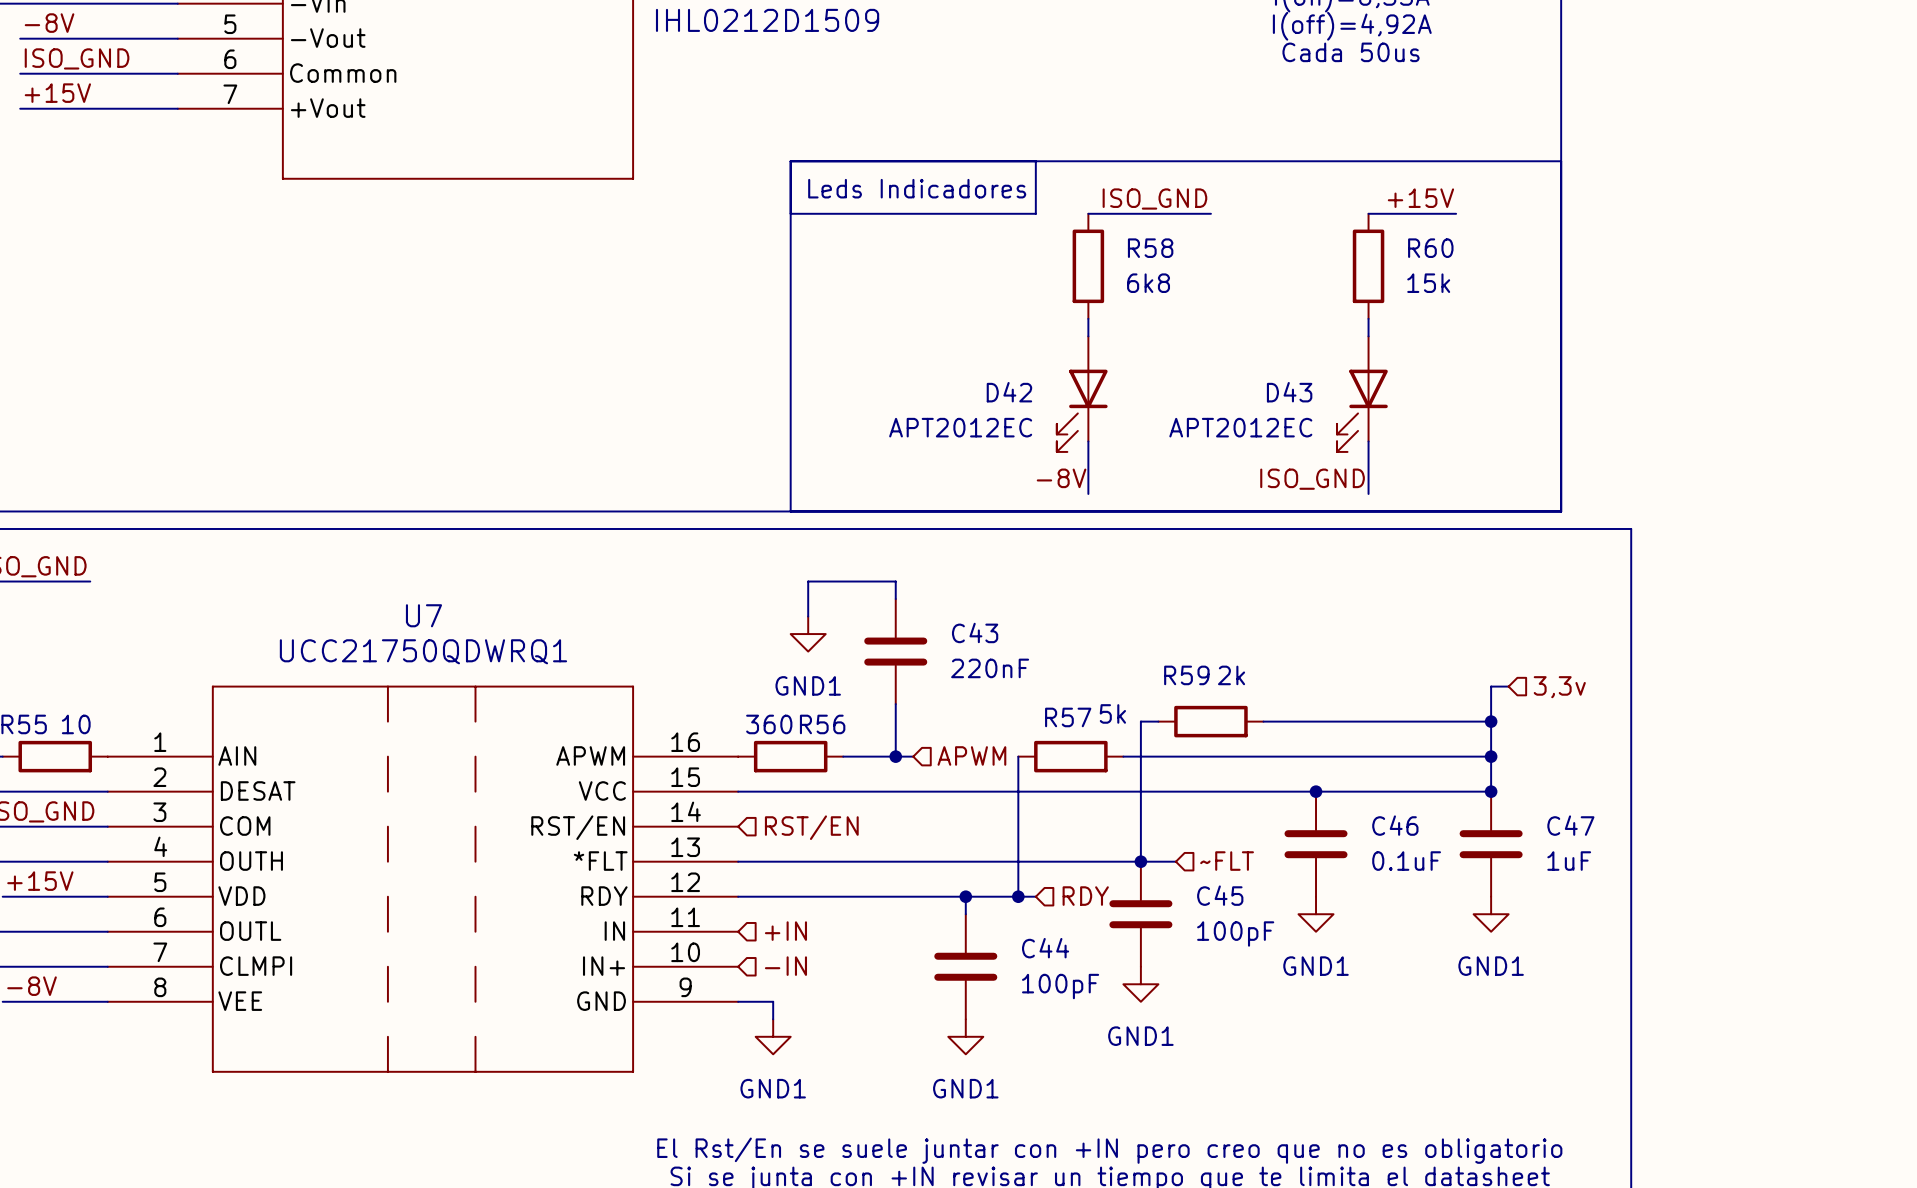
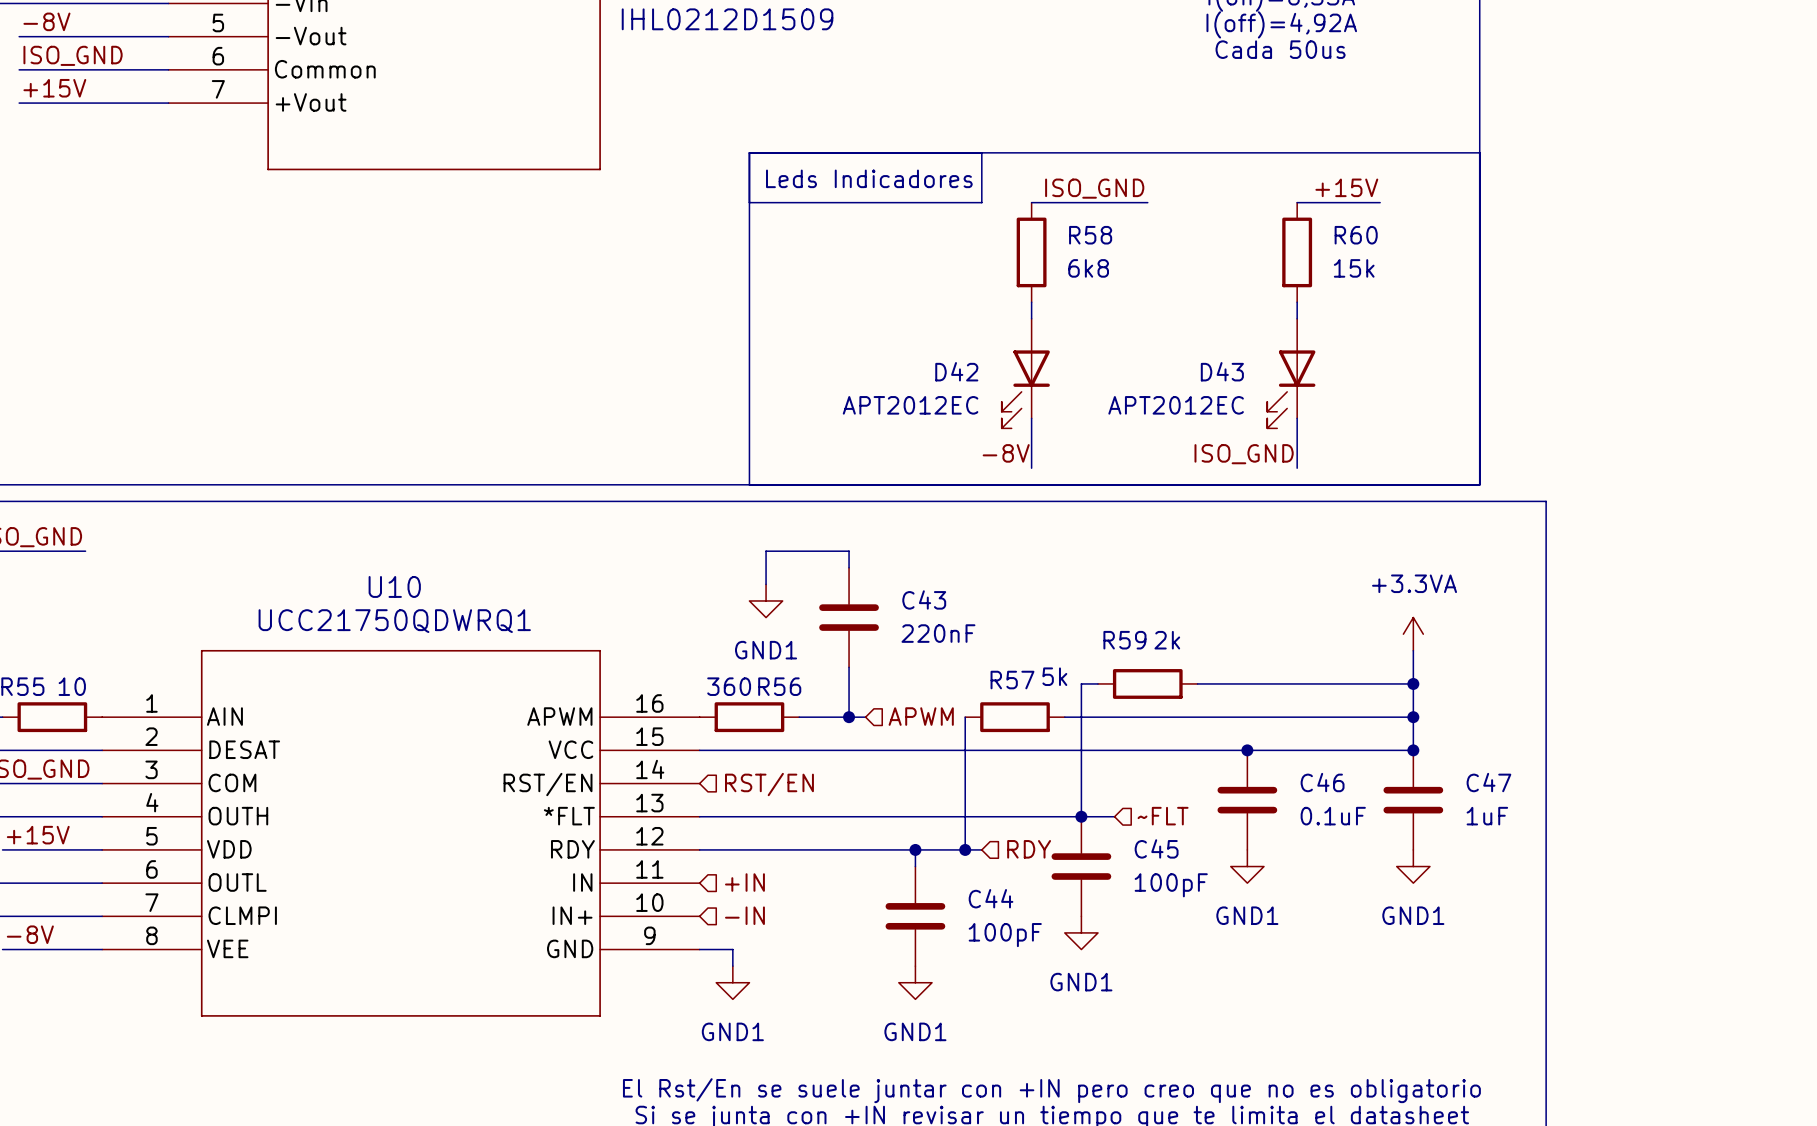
power symbol: none -> +3.3VA (1413, 634)
wire: (1491, 686) (1508, 686) -> none
hierarchical label: 3,3v (1559, 687) -> none
U7: UCC21750QDWRQ1 (422, 879) -> none
U10: none -> UCC21750QDWRQ1 (400, 833)

